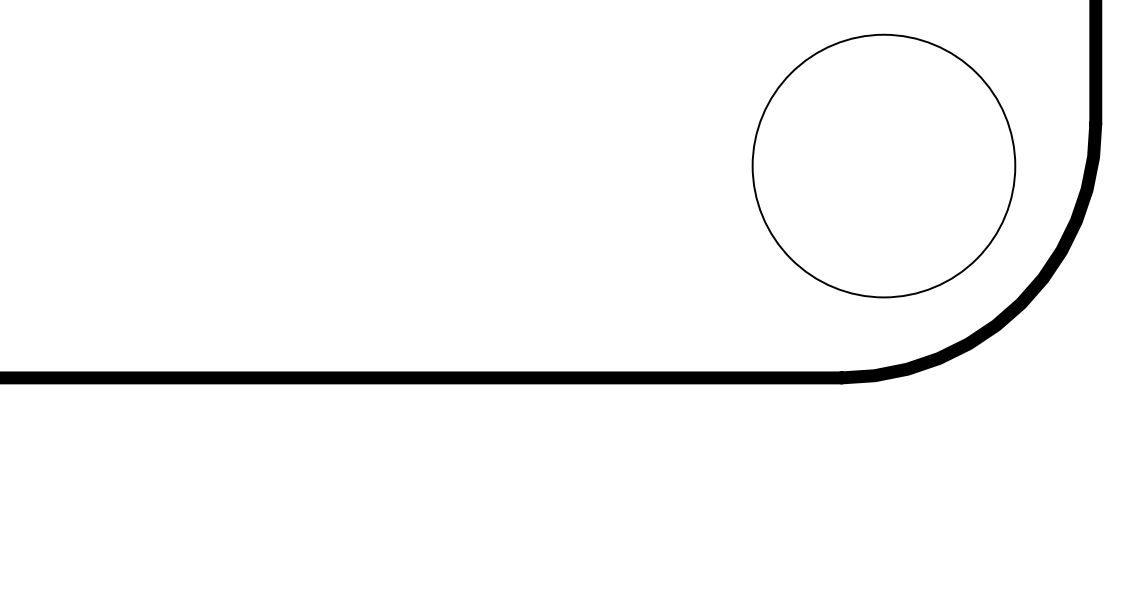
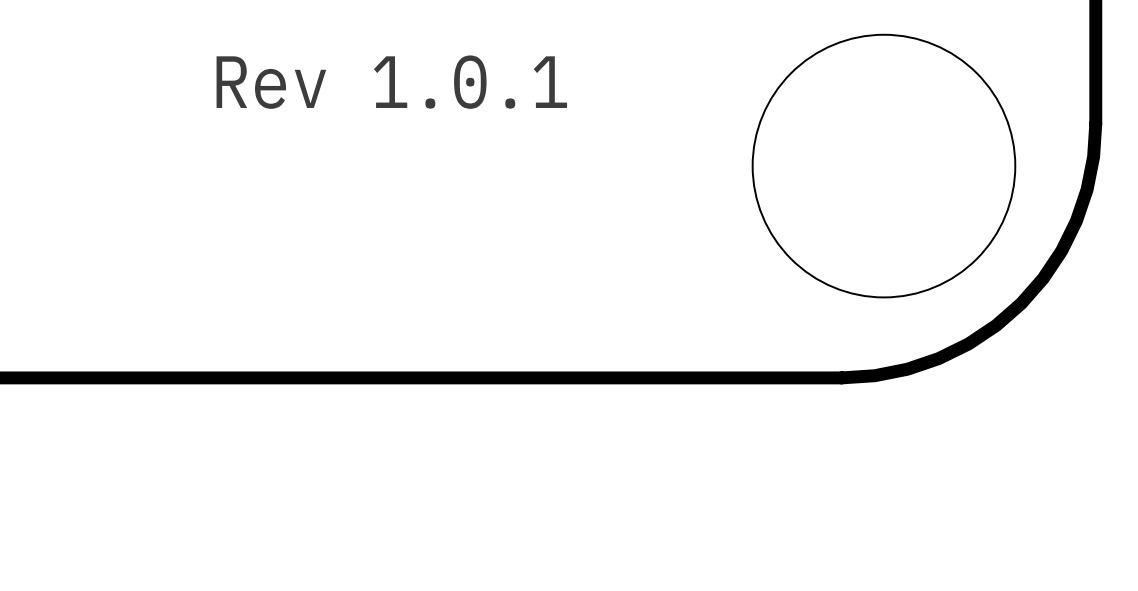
text: none -> Rev 1.0.1 (391, 82)

